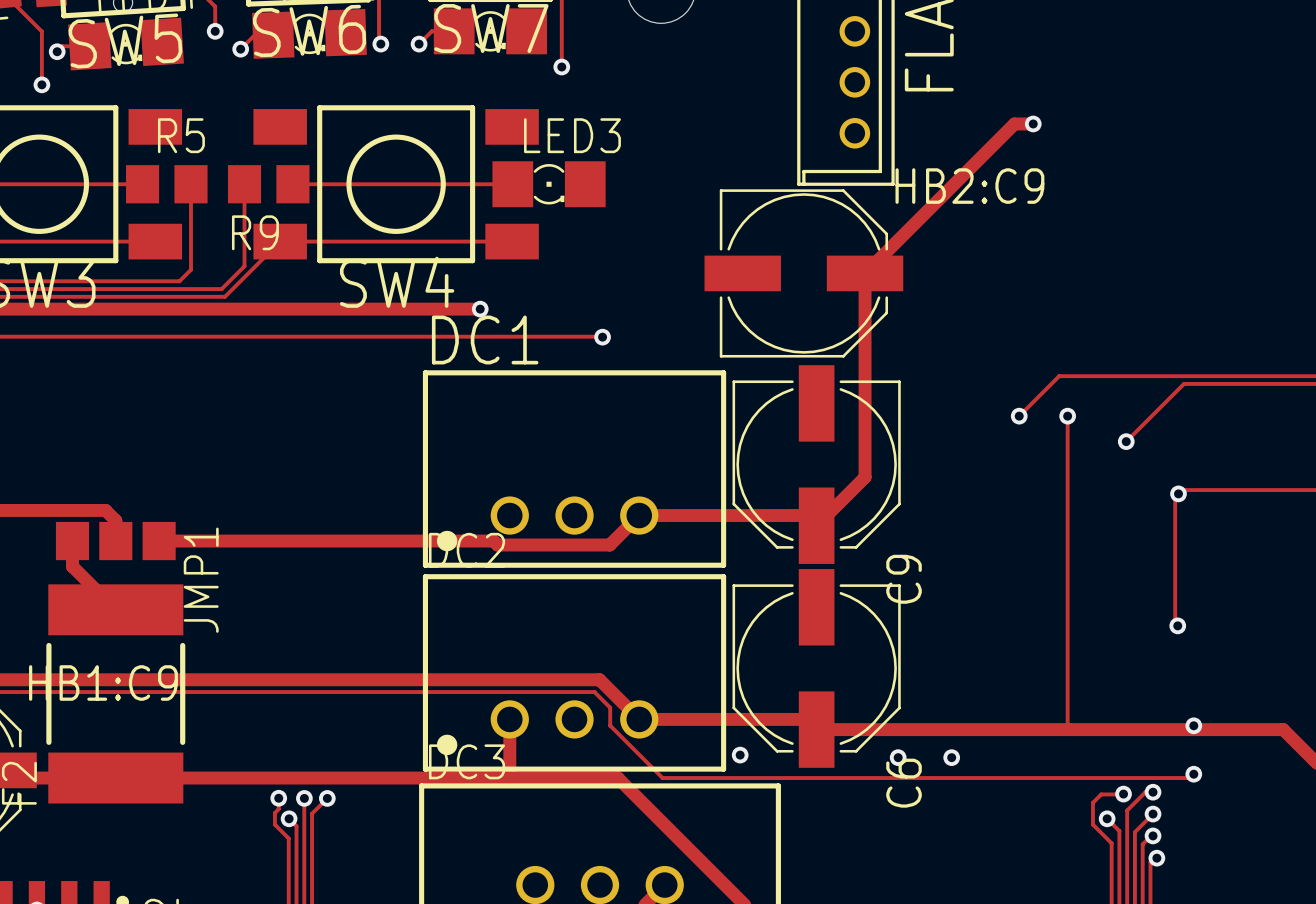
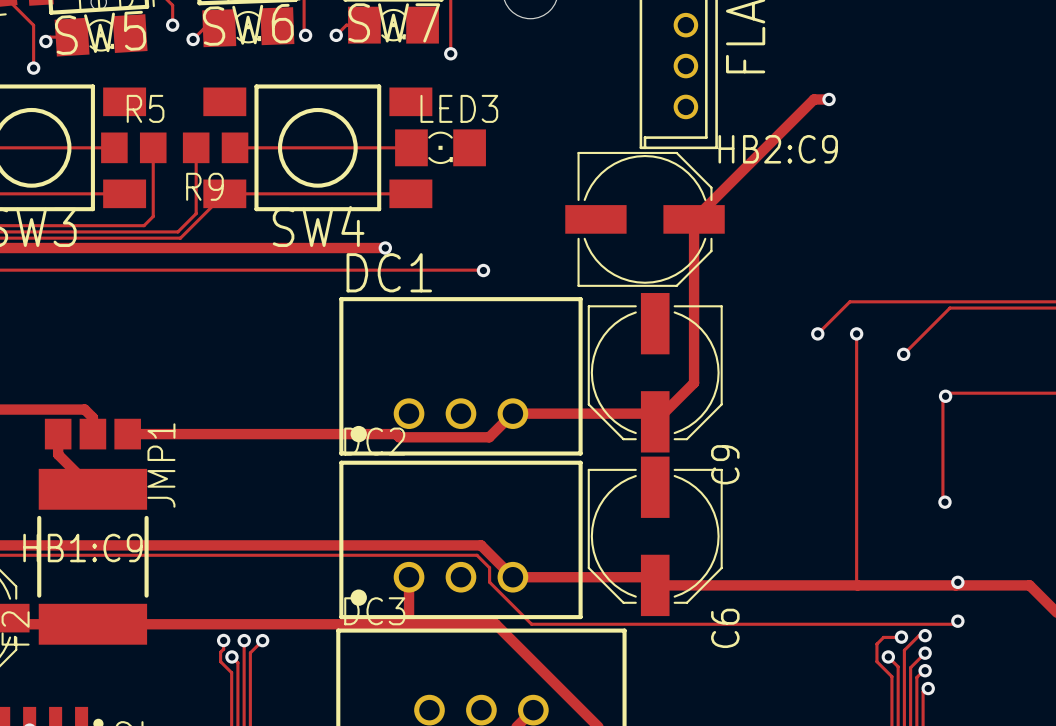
via: (740, 755) -> none
via: (898, 757) -> none
via: (951, 757) -> none

